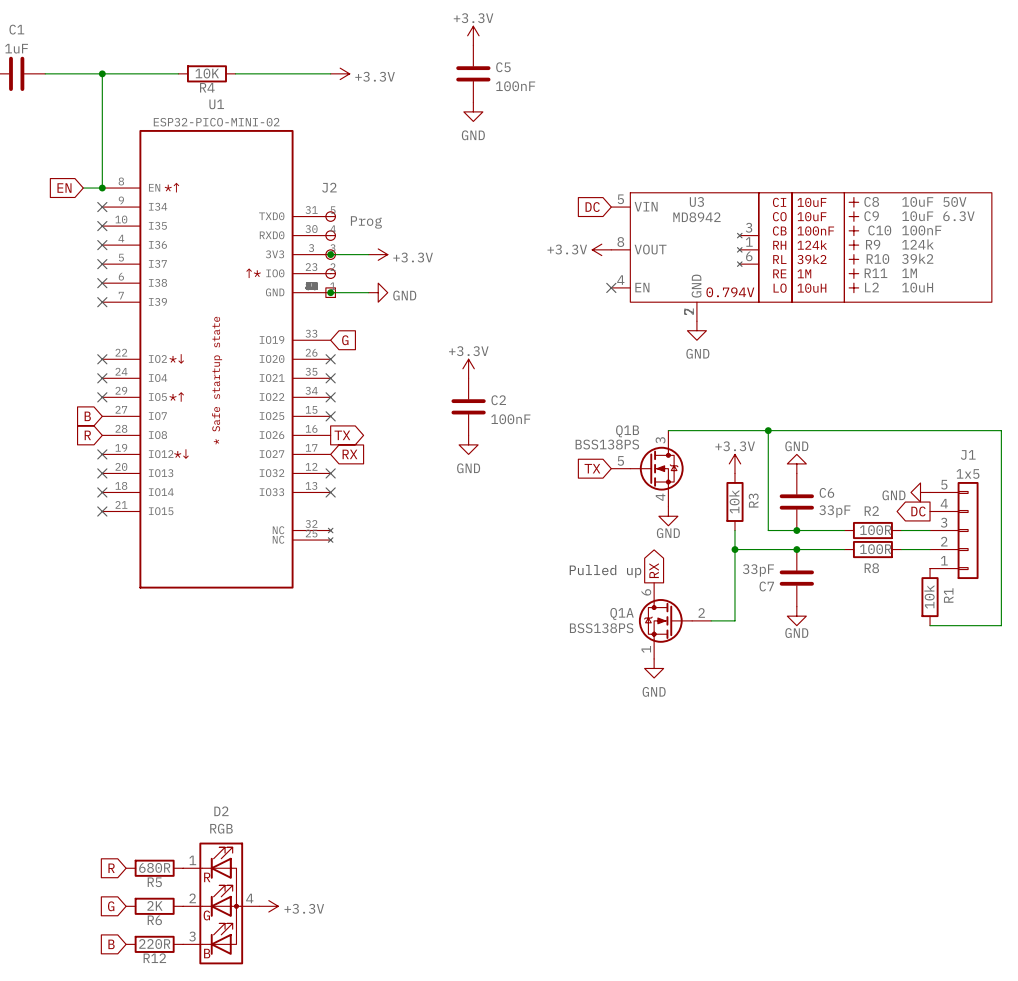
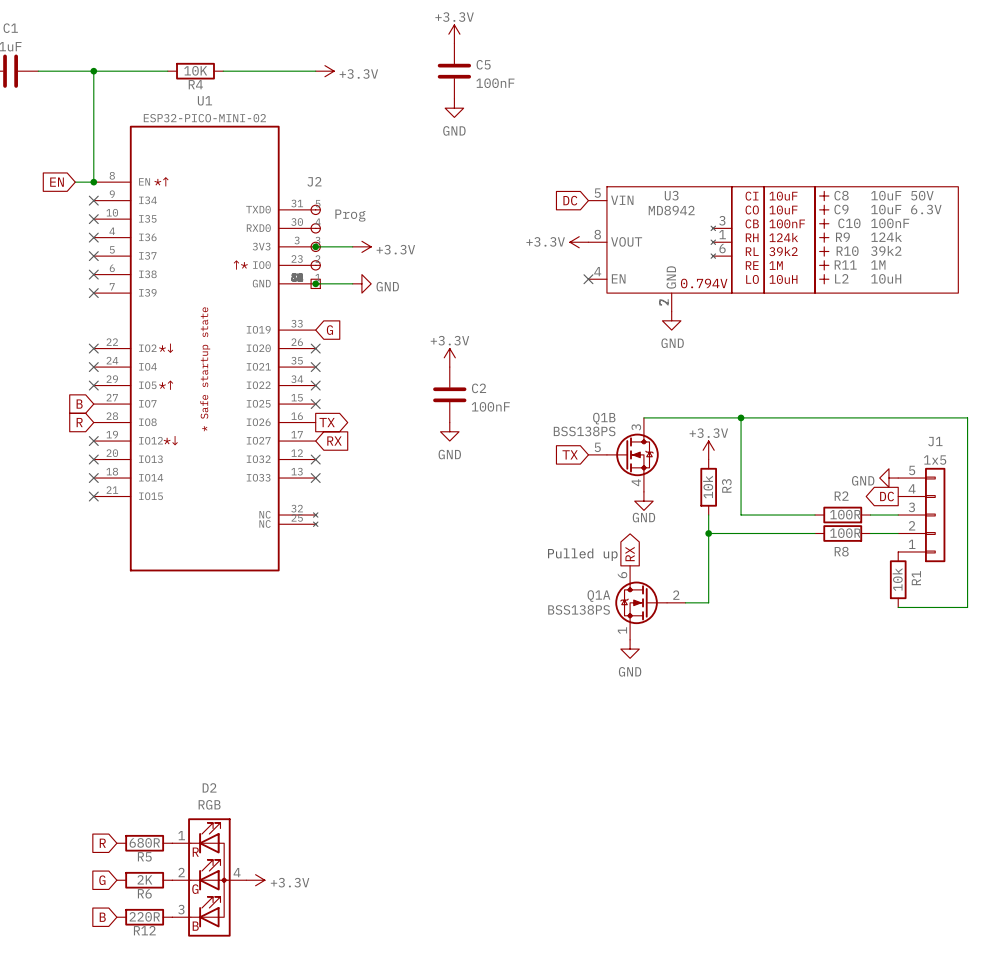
power symbol: GND (796, 463) -> none
C6: 33pF (796, 501) -> none
junction: (796, 530) -> none
junction: (796, 549) -> none
C7: 33pF (796, 578) -> none
power symbol: GND (796, 616) -> none

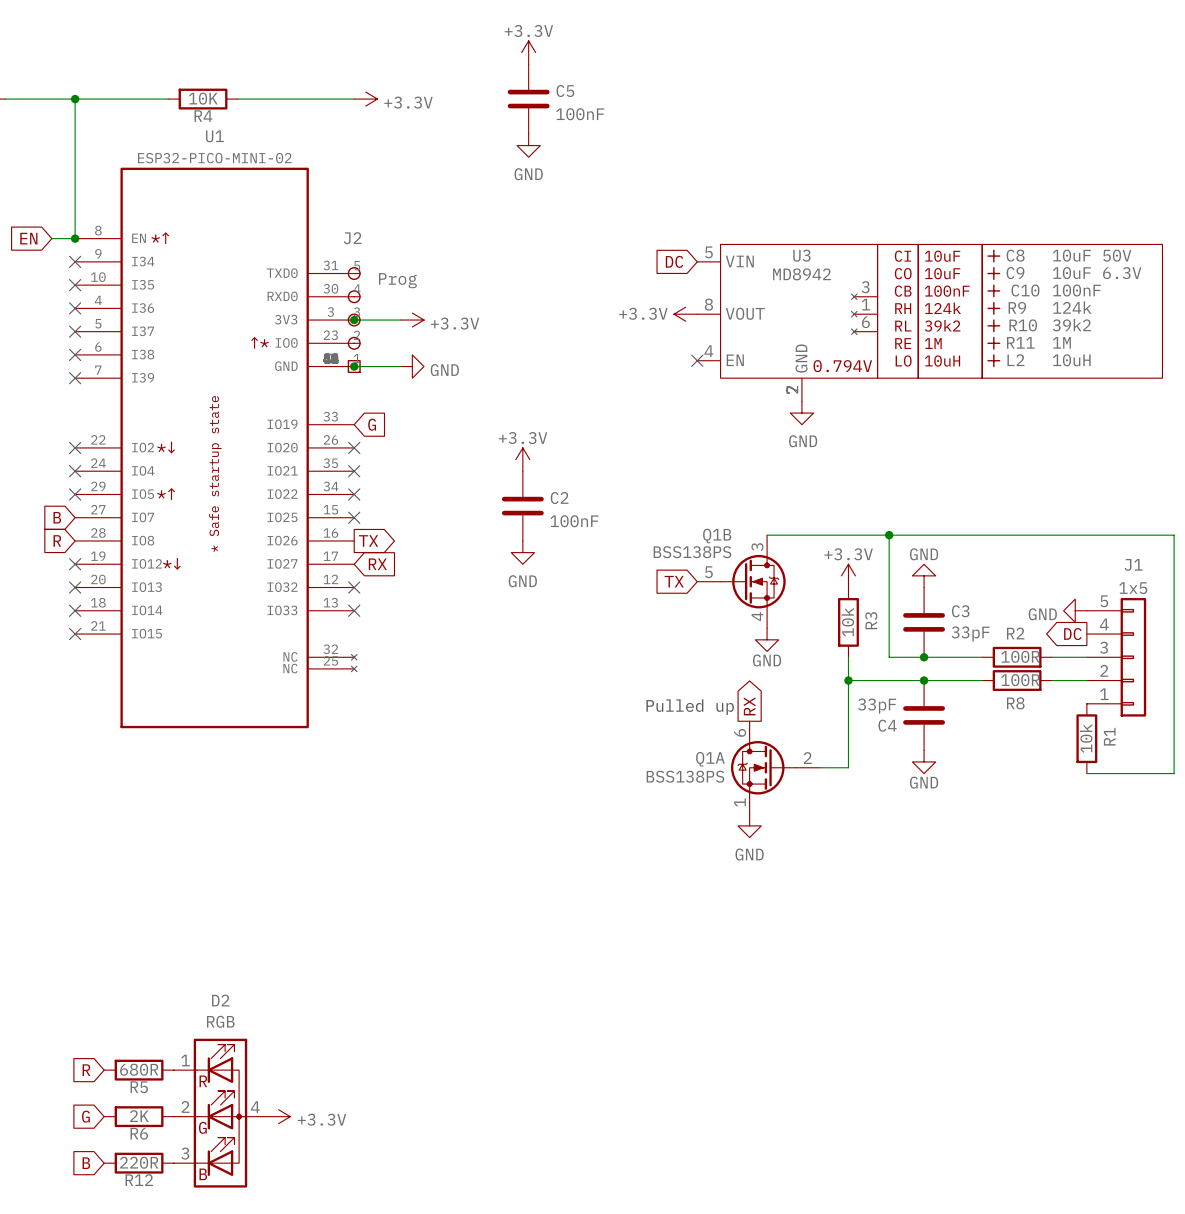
power symbol: none -> GND (924, 575)
C3: none -> 33pF (924, 622)
junction: none -> (924, 657)
junction: none -> (924, 680)
C4: none -> 33pF (924, 715)
power symbol: none -> GND (924, 761)

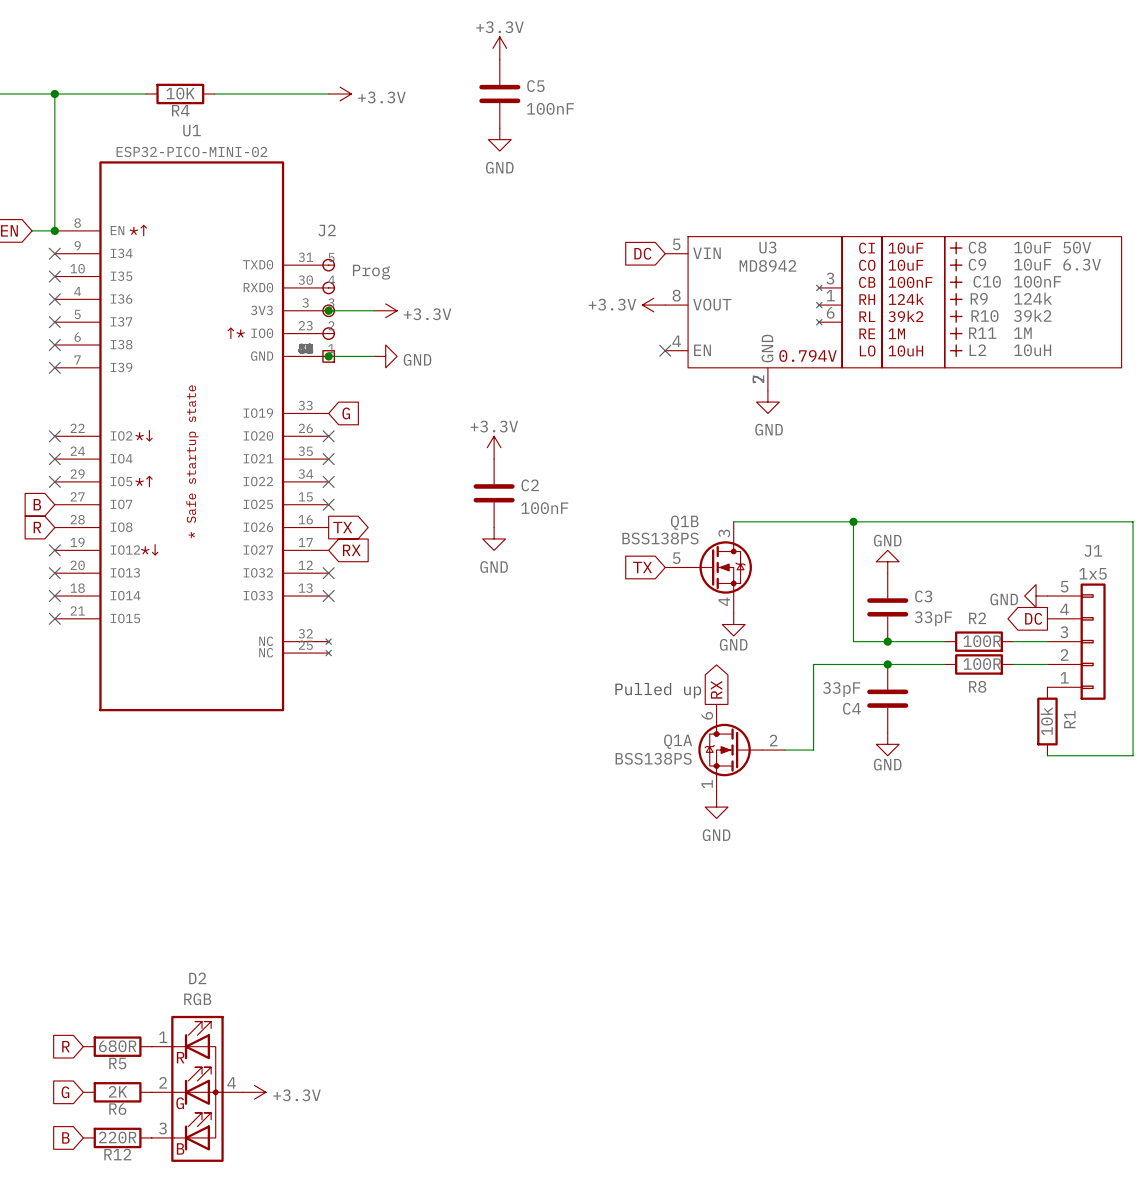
power symbol: +3.3V (848, 575) -> none
R3: 10k (848, 622) -> none
wire: (848, 657) (848, 680) -> none
junction: (848, 680) -> none

